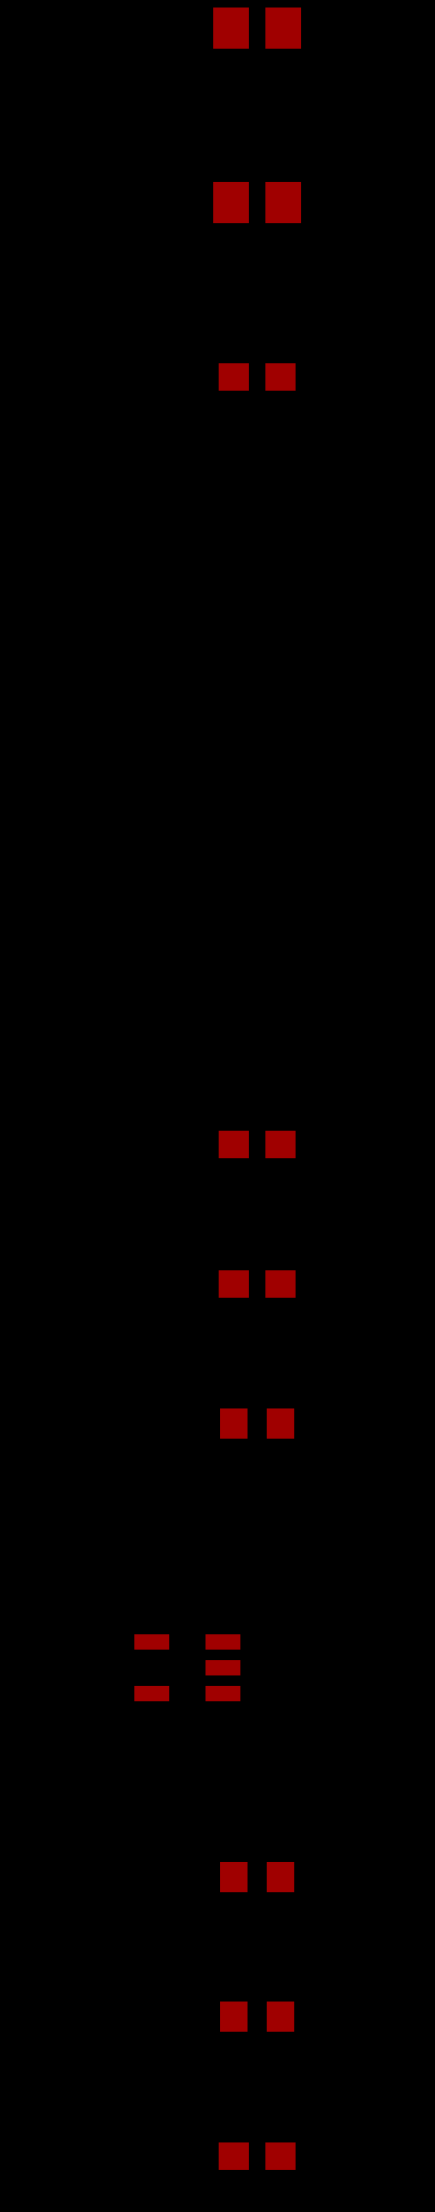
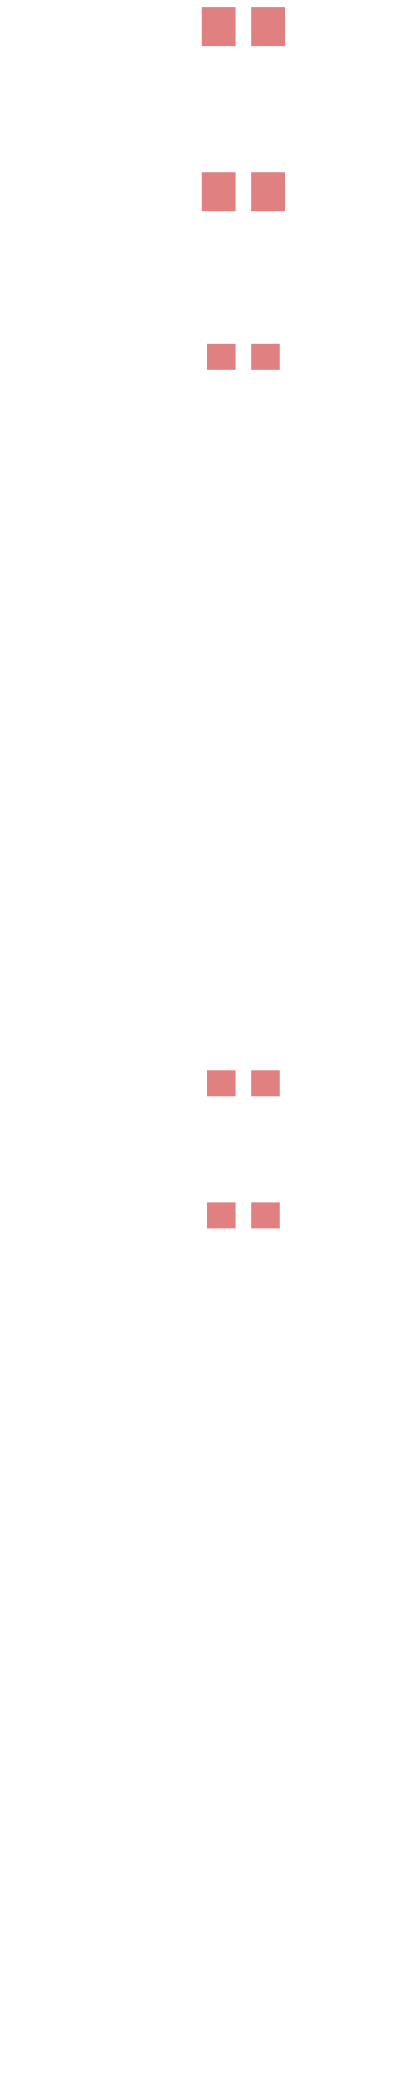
part: (257, 1423) -> none
part: (187, 1667) -> none
part: (257, 1877) -> none
part: (257, 2016) -> none
part: (257, 2156) -> none

